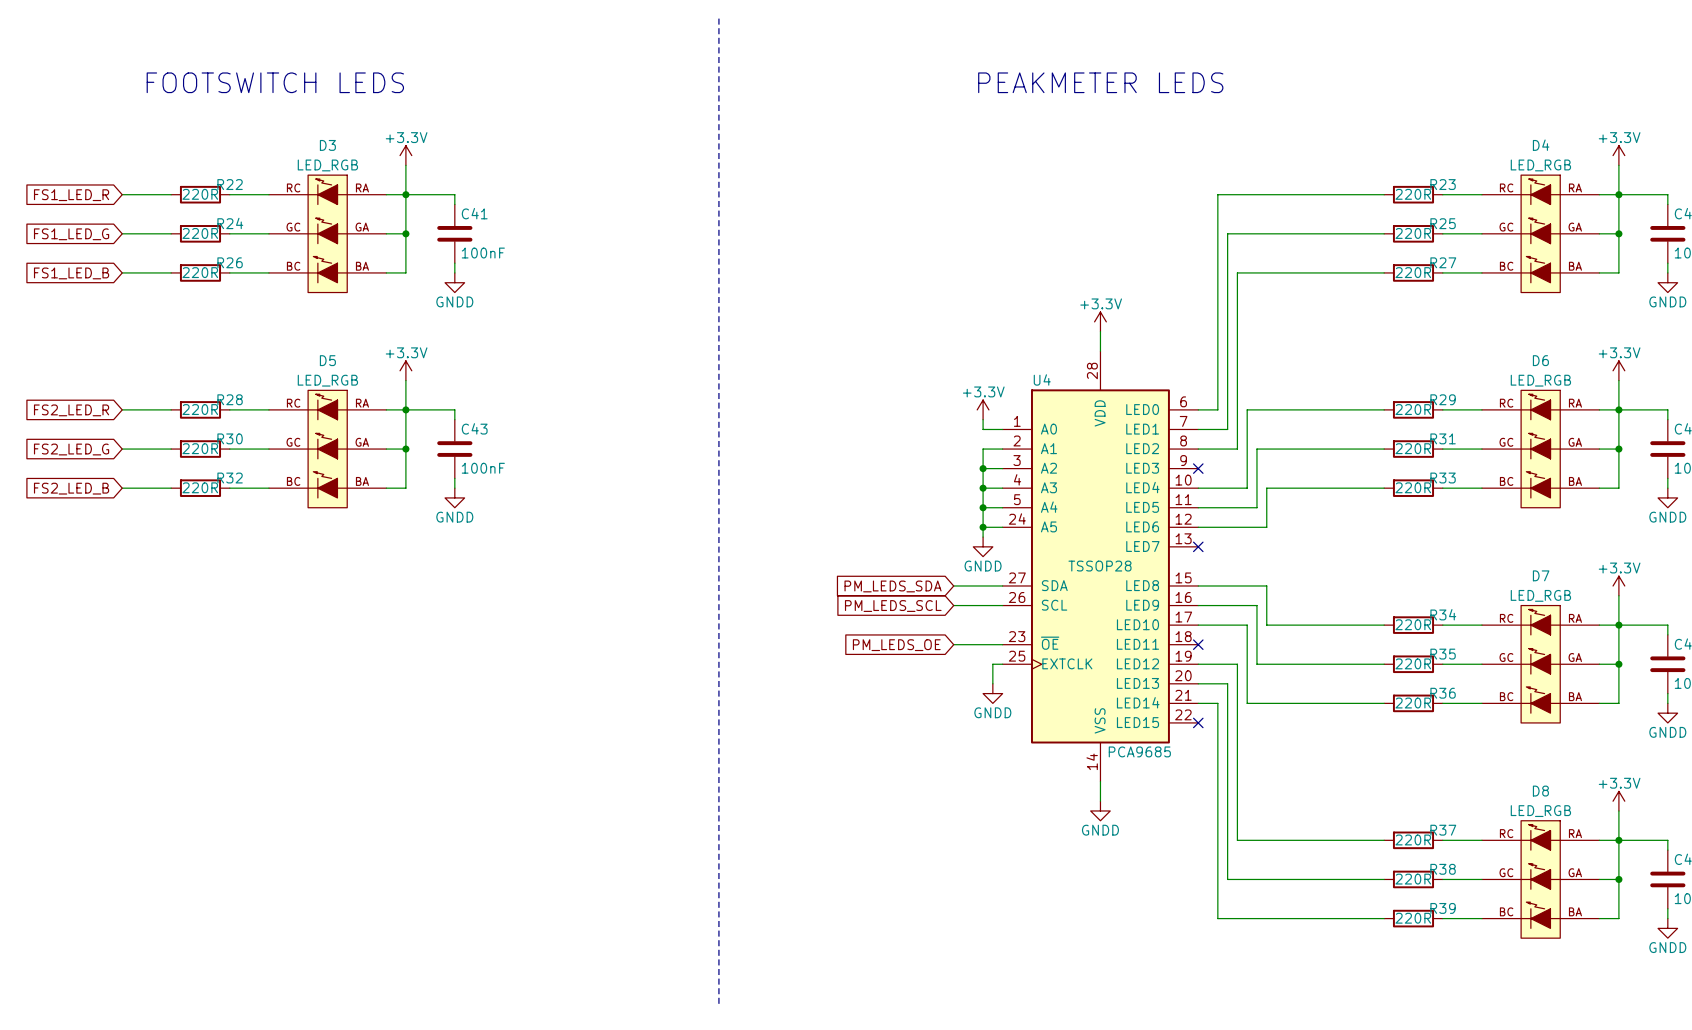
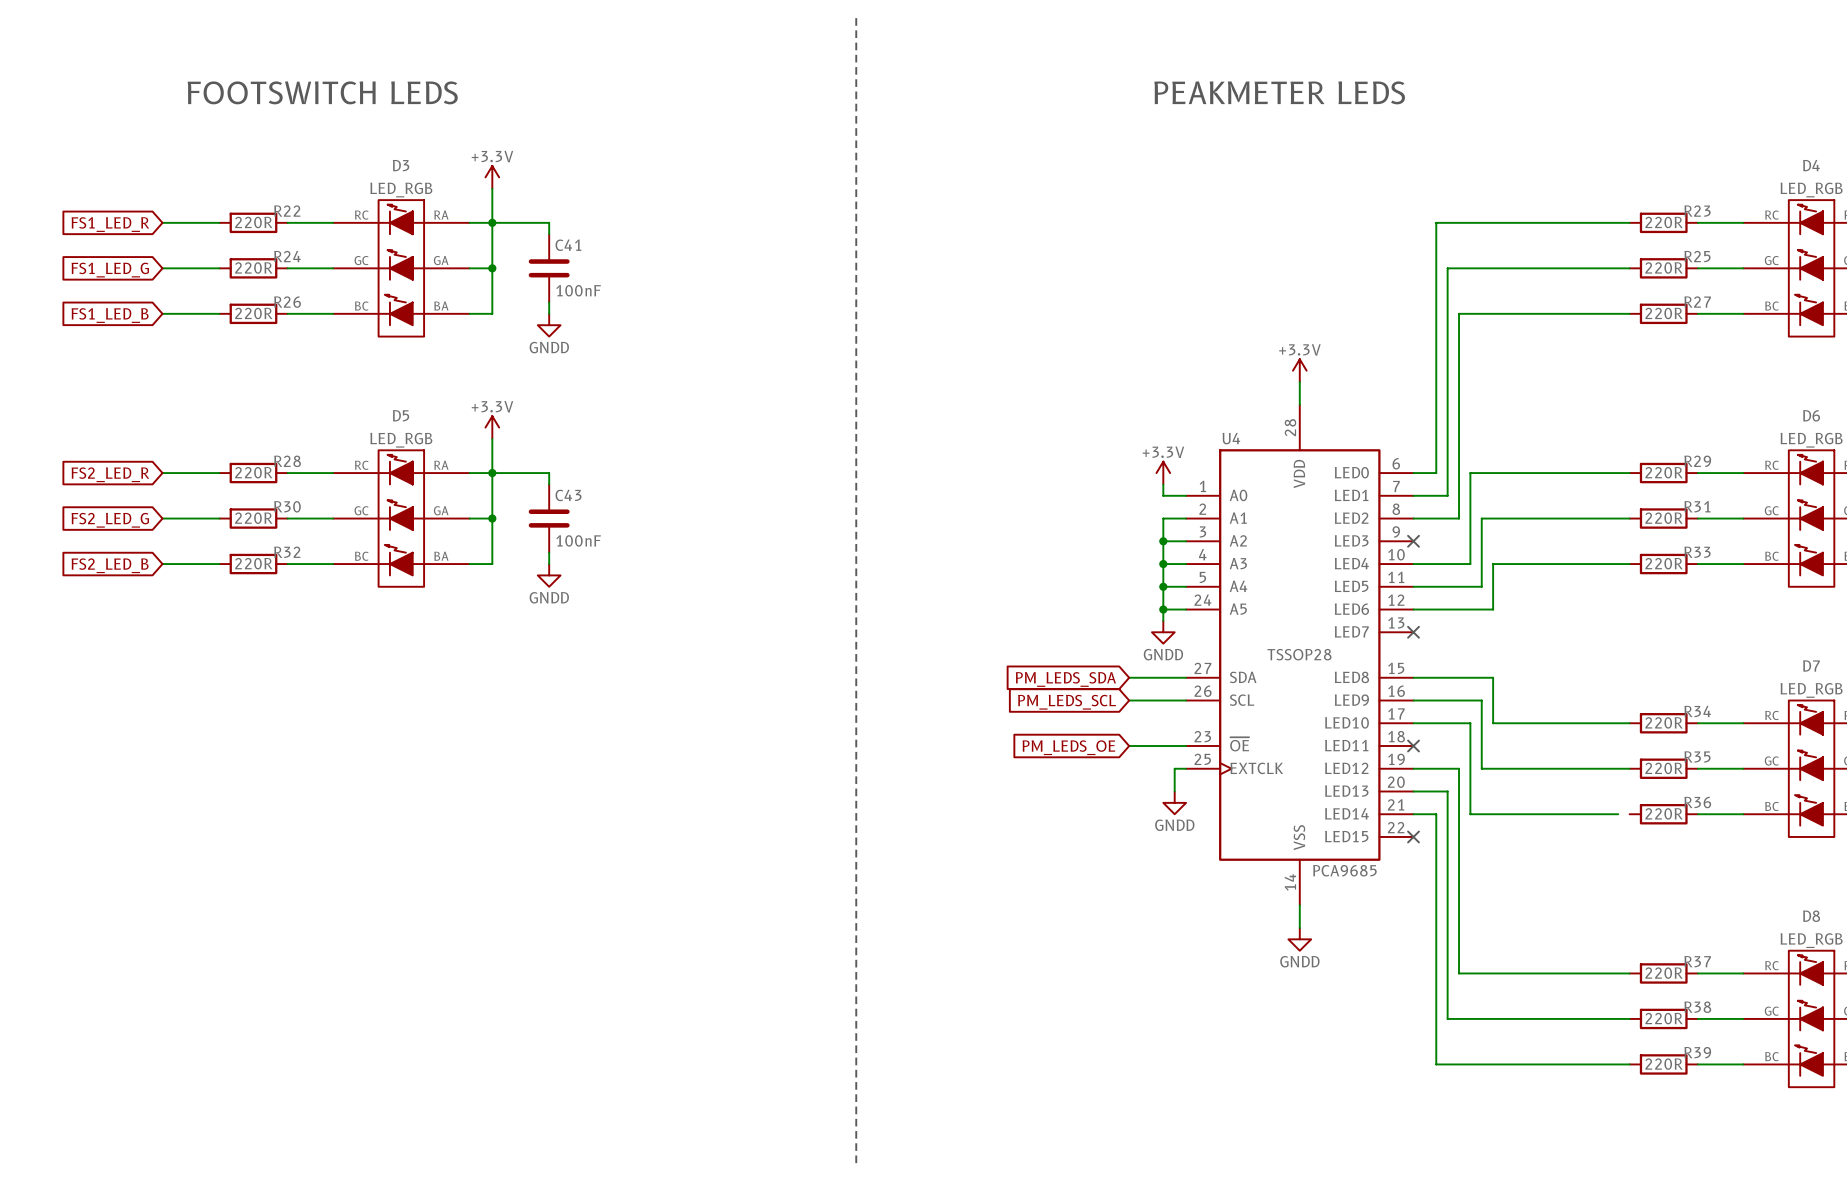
wire: (1374, 703) (1384, 703) -> none

